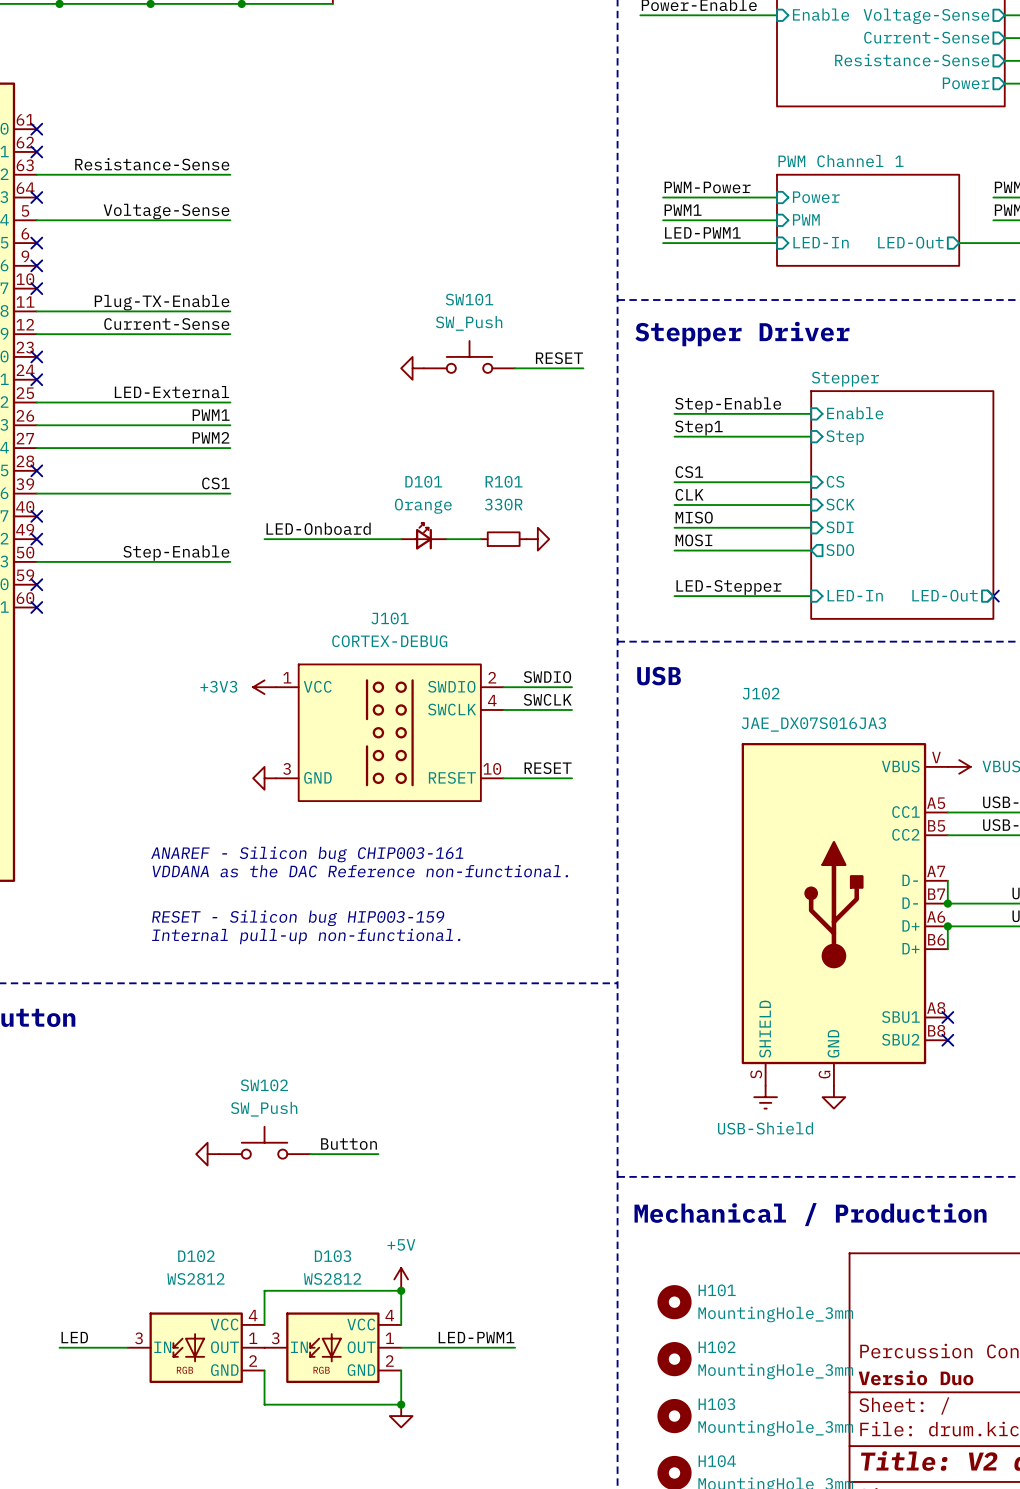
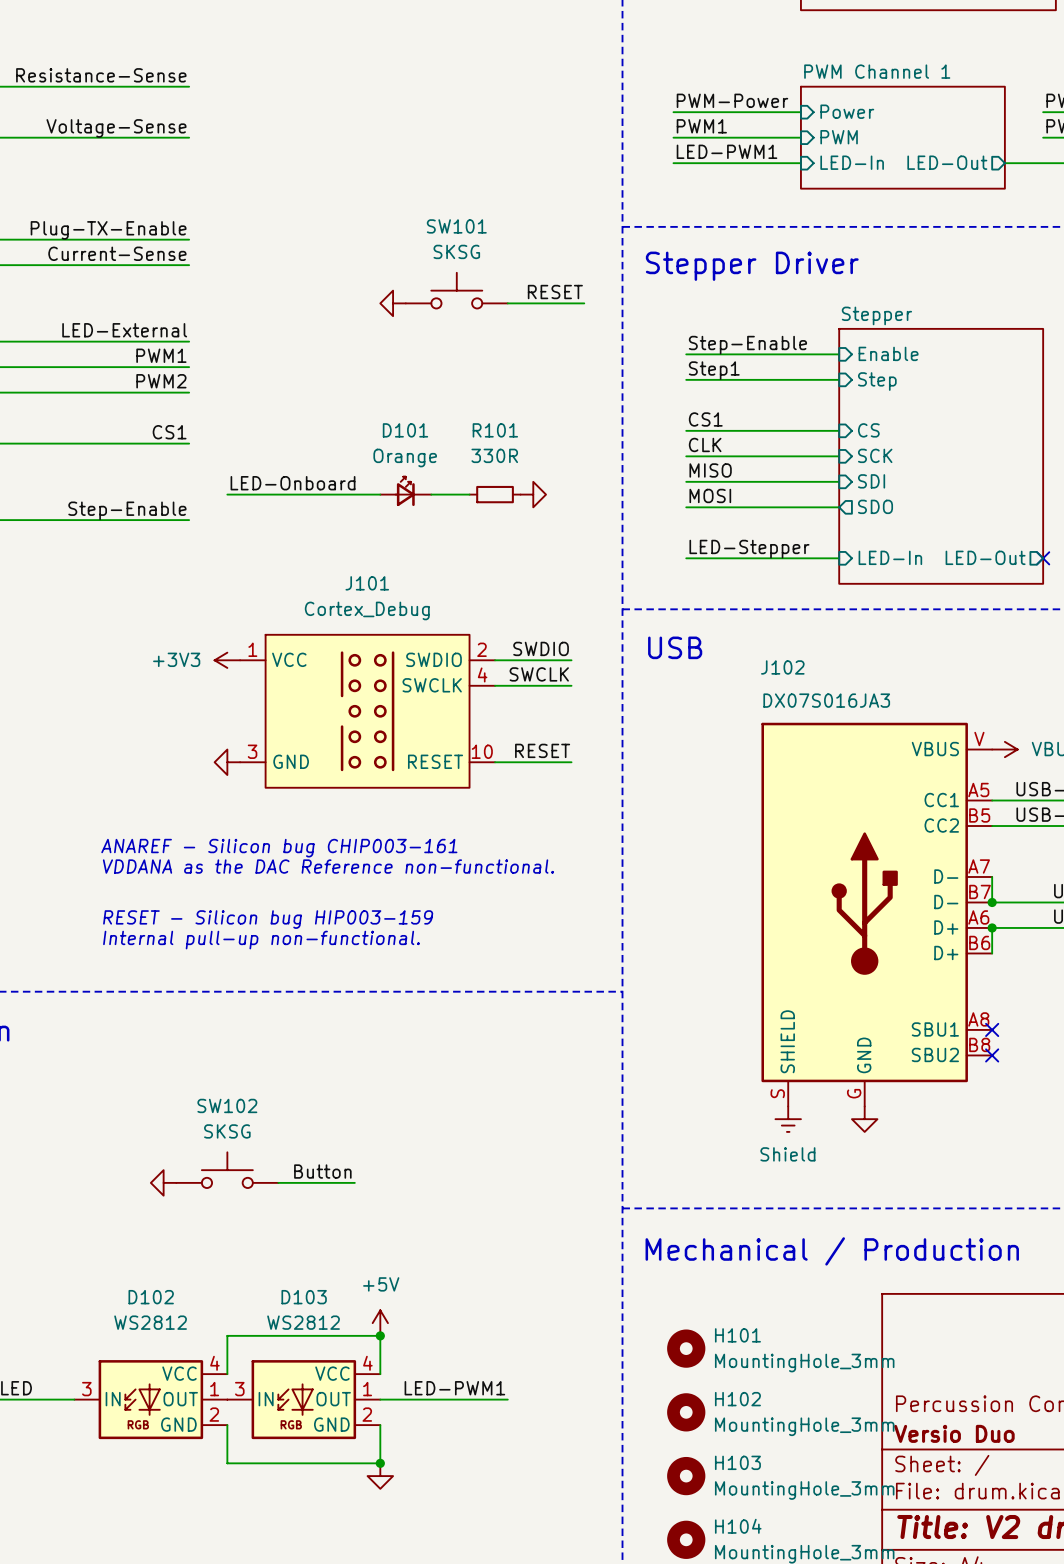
SW101 value: SW_Push (469, 323) -> SKSG (456, 251)
J101 value: CORTEX-DEBUG (389, 641) -> Cortex_Debug (367, 610)
J102 value: JAE_DX07S016JA3 (813, 724) -> DX07S016JA3 (826, 700)
power symbol: USB-Shield (765, 1097) -> Shield (788, 1119)
SW102 value: SW_Push (264, 1109) -> SKSG (227, 1131)

